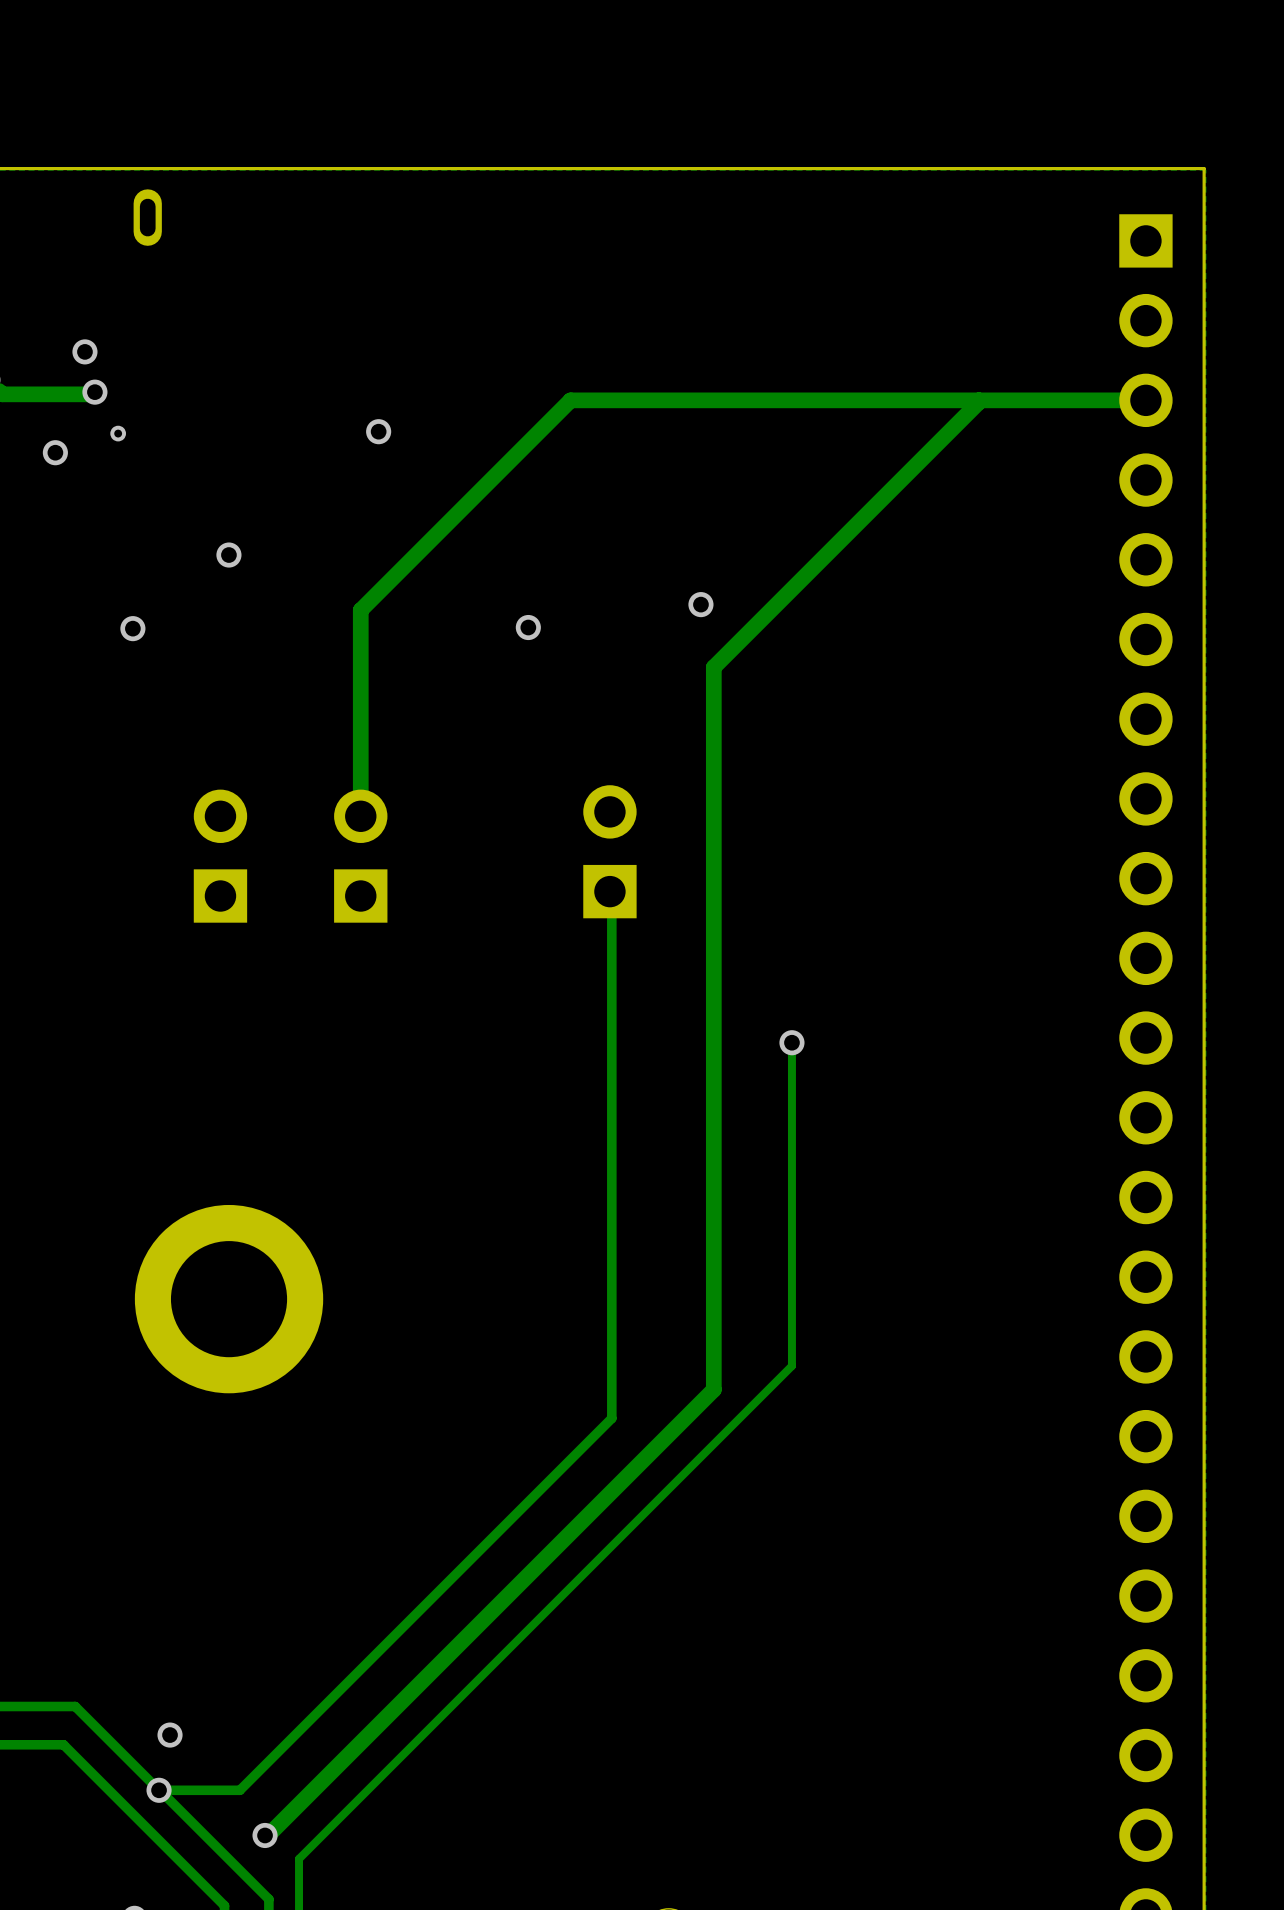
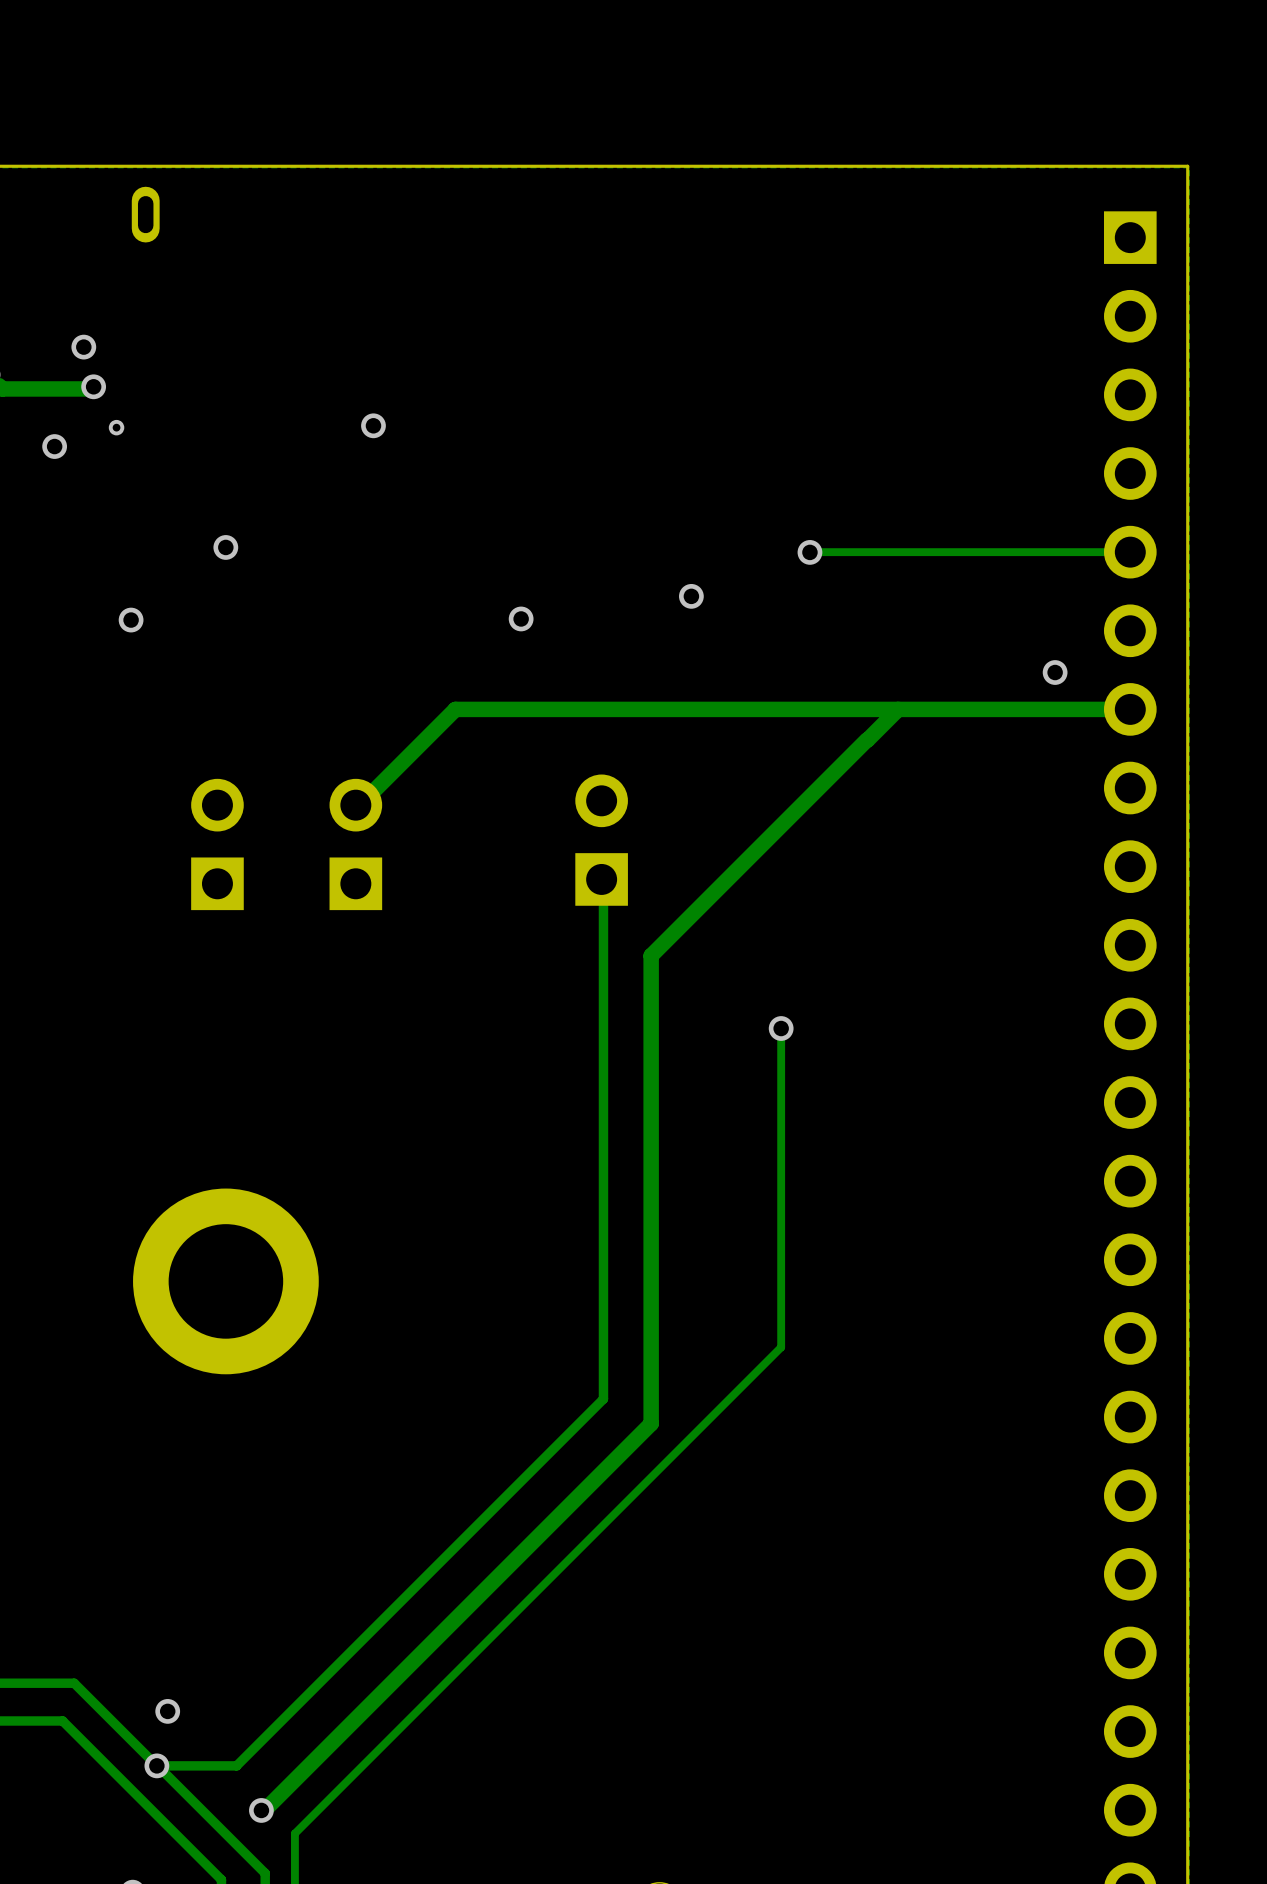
track: (978, 400) (713, 667) (713, 1389) (660, 1443) -> (898, 709) (651, 955) (651, 1423)
track: (1145, 400) (570, 400) (360, 610) (360, 816) -> (1130, 709) (455, 709) (359, 805) (355, 805)
track: none -> (1130, 552) (810, 552)
via: none -> (809, 552)
via: none -> (1055, 672)

